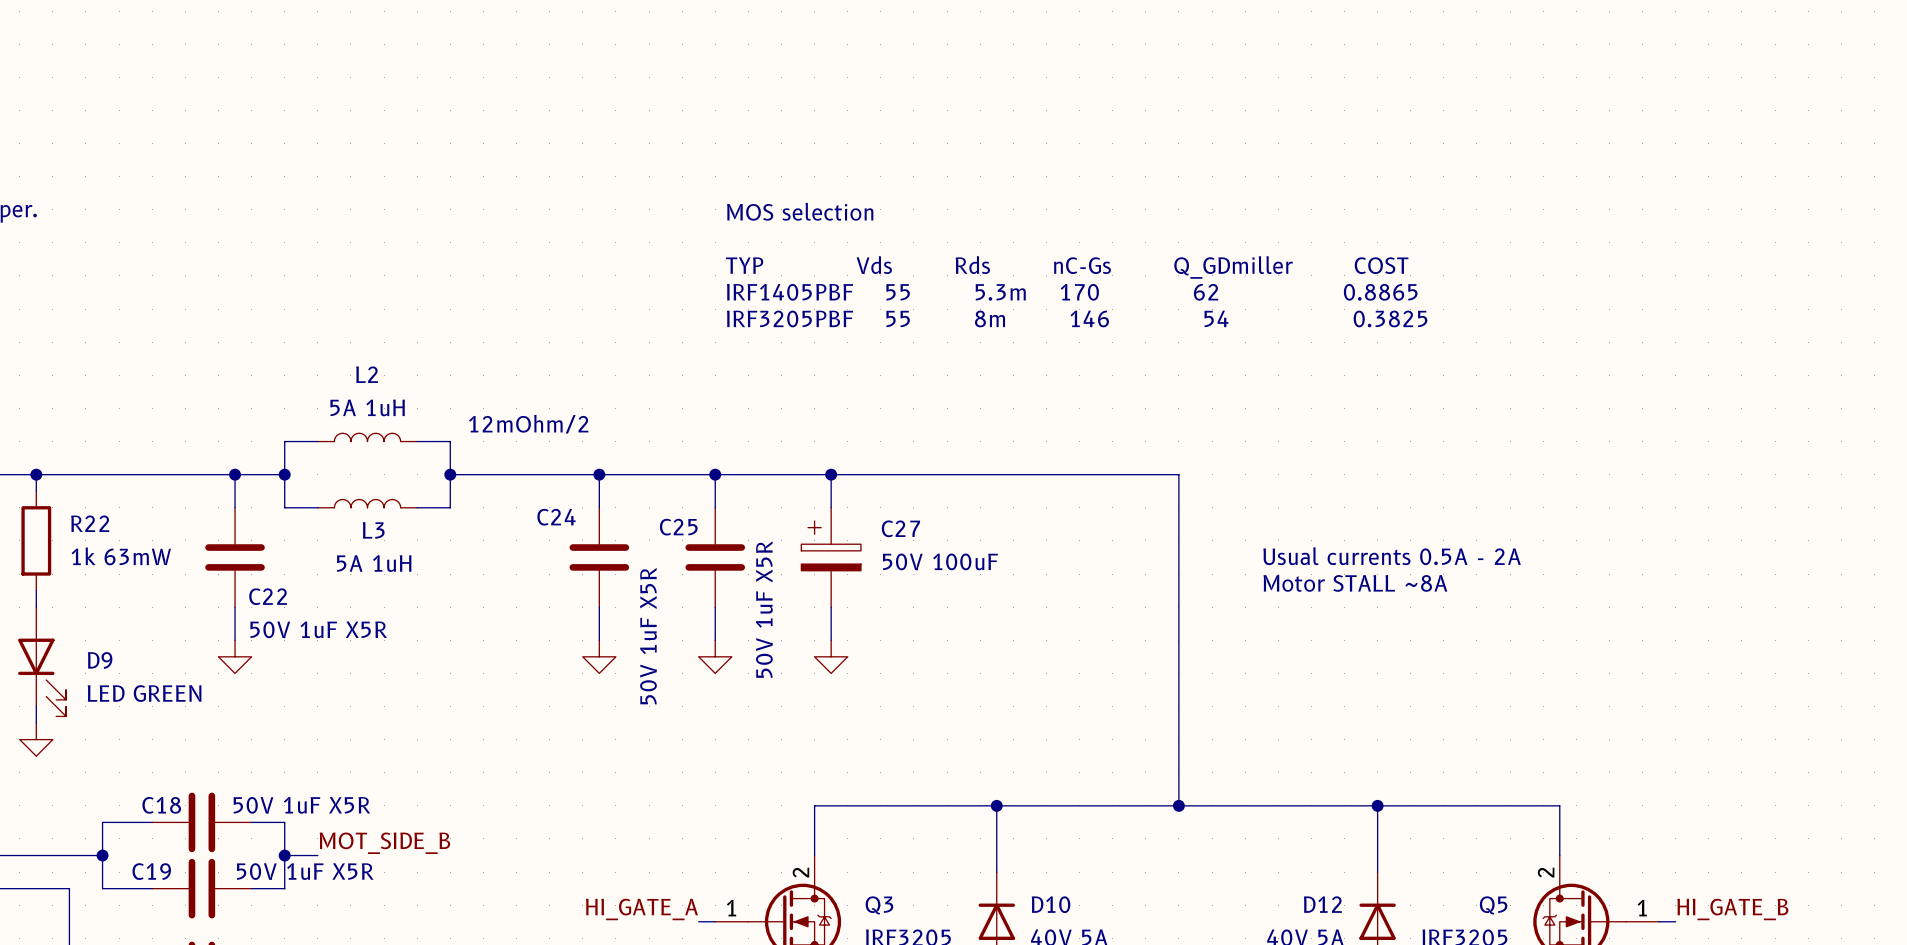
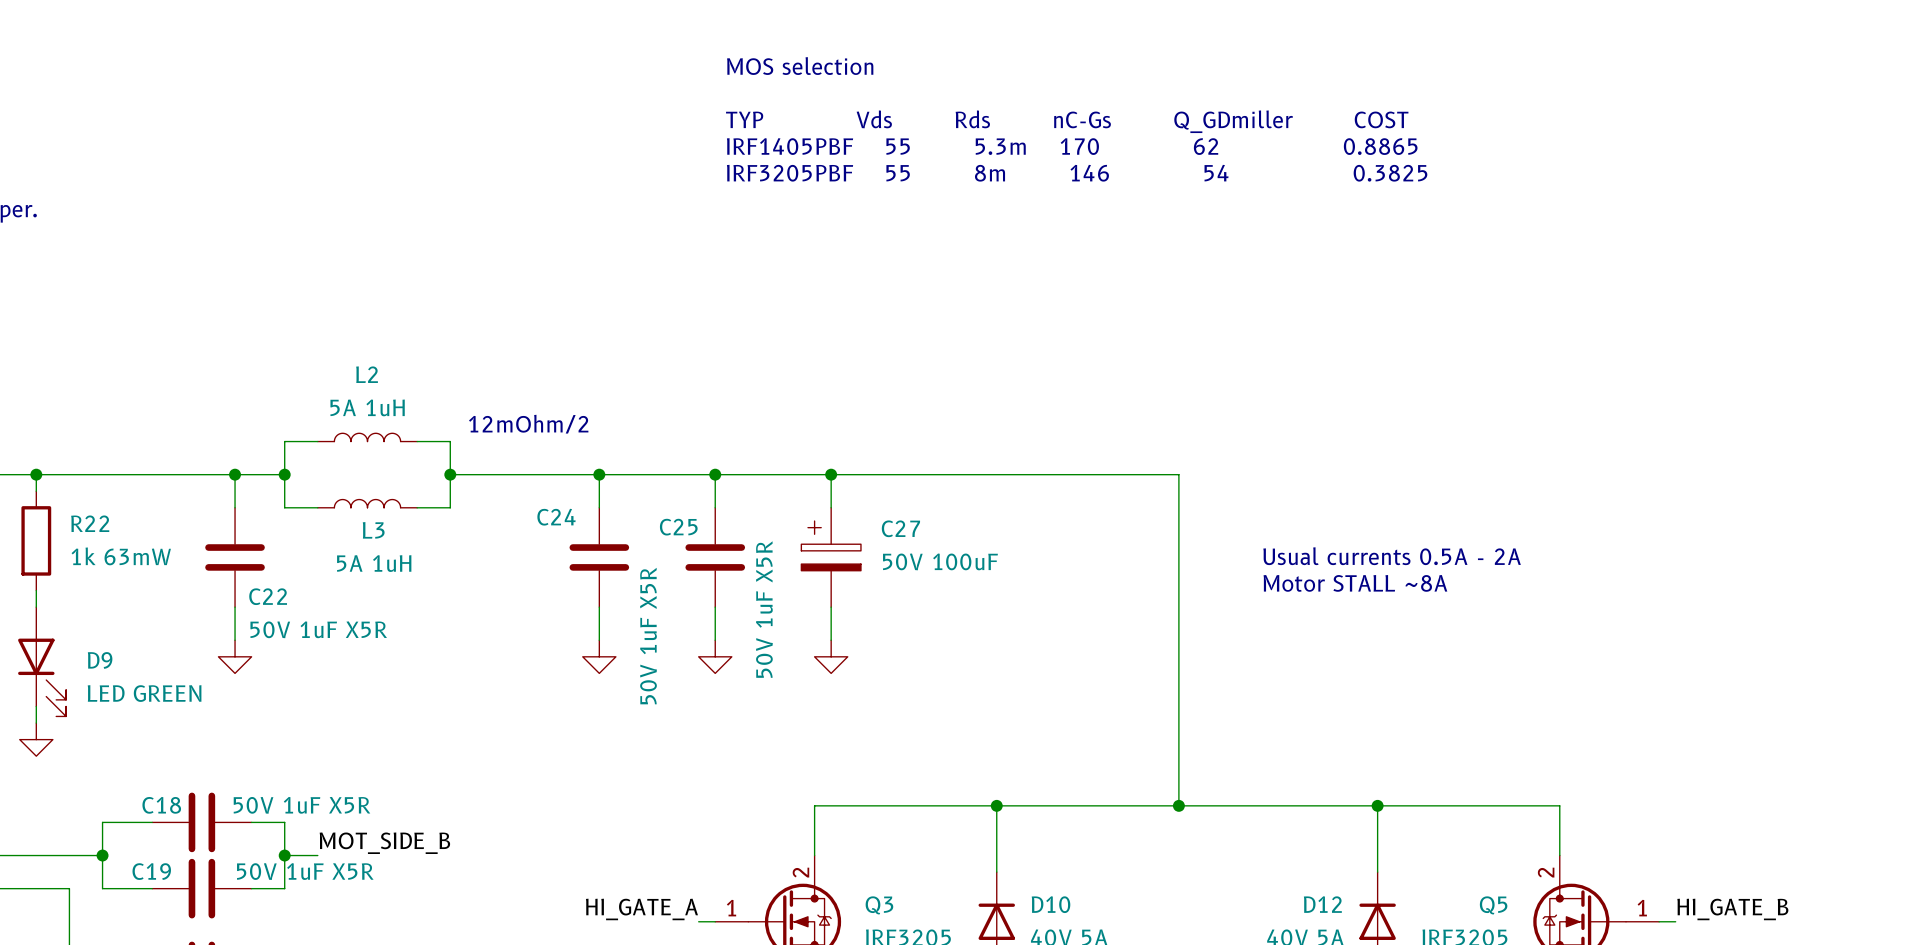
text position: MOS selection (800, 211) -> MOS selection (800, 66)
text position: TYP Vds Rds nC-Gs Q_GDmiller COST (1067, 267) -> TYP Vds Rds nC-Gs Q_GDmiller COST (1067, 121)
text position: IRF1405PBF 55 5.3m 170 62 0.8865 (1072, 292) -> IRF1405PBF 55 5.3m 170 62 0.8865 (1072, 146)
text position: IRF3205PBF 55 8m 146 54 0.3825 (1077, 318) -> IRF3205PBF 55 8m 146 54 0.3825 (1077, 173)

